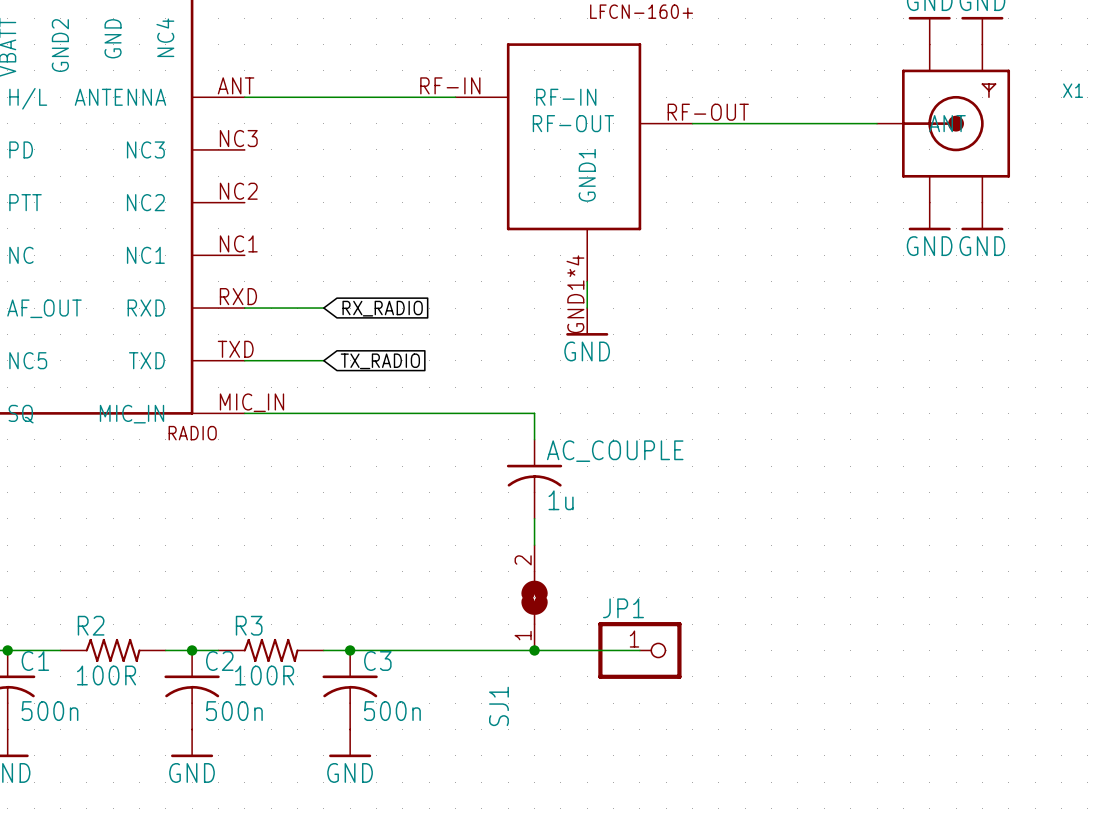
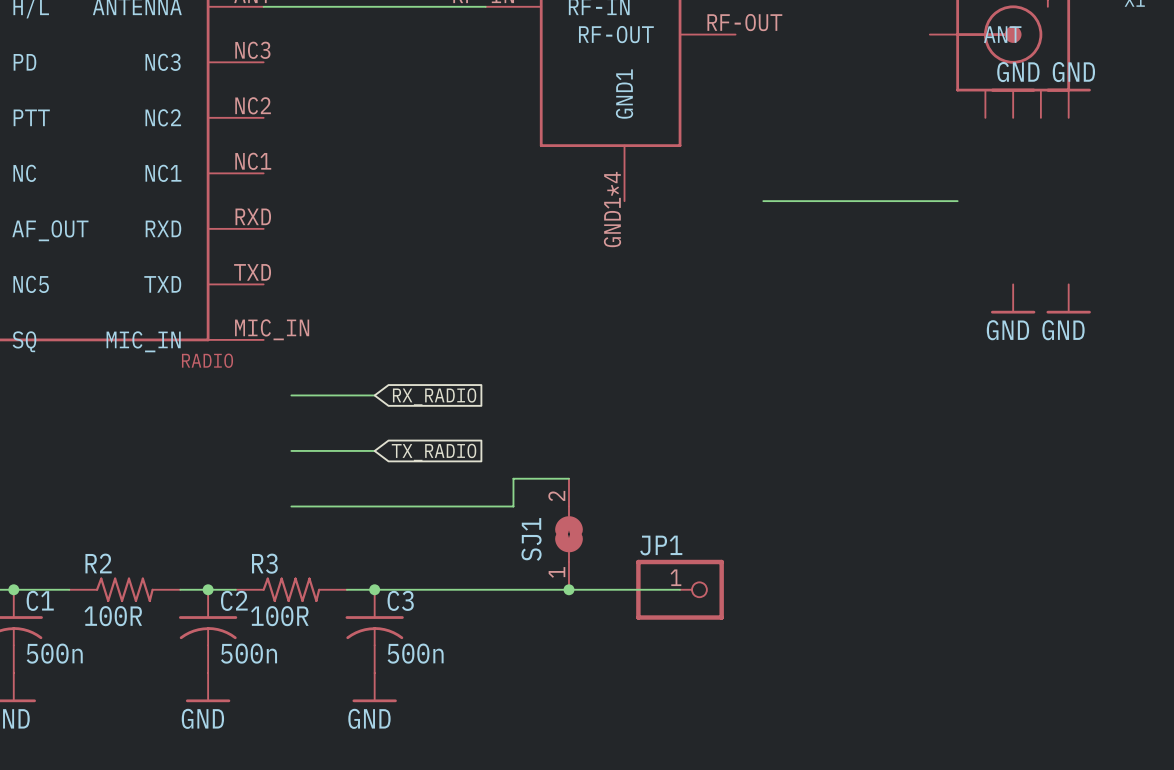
wire: (692, 123) (877, 123) -> (763, 201) (957, 201)
power symbol: none -> GND (1013, 103)
power symbol: none -> GND (1068, 103)
power symbol: GND (929, 216) -> none
power symbol: GND (982, 216) -> none
wire: (587, 281) (587, 308) -> none
wire: (244, 308) (323, 308) -> (291, 395) (374, 395)
global label position: RX_RADIO (382, 308) -> RX_RADIO (434, 397)
power symbol: GND (587, 321) -> none
wire: (244, 360) (323, 360) -> (291, 450) (374, 450)
global label position: TX_RADIO (380, 361) -> TX_RADIO (434, 452)
power symbol: none -> GND (1013, 298)
power symbol: none -> GND (1068, 298)
wire: (244, 413) (534, 413) (534, 439) -> none
AC_COUPLE: 1u (534, 479) -> none
wire: (534, 518) (534, 545) -> (291, 506) (513, 506) (513, 478) (568, 478)
SJ1 name position: SJ1 (498, 706) -> SJ1 (531, 539)

